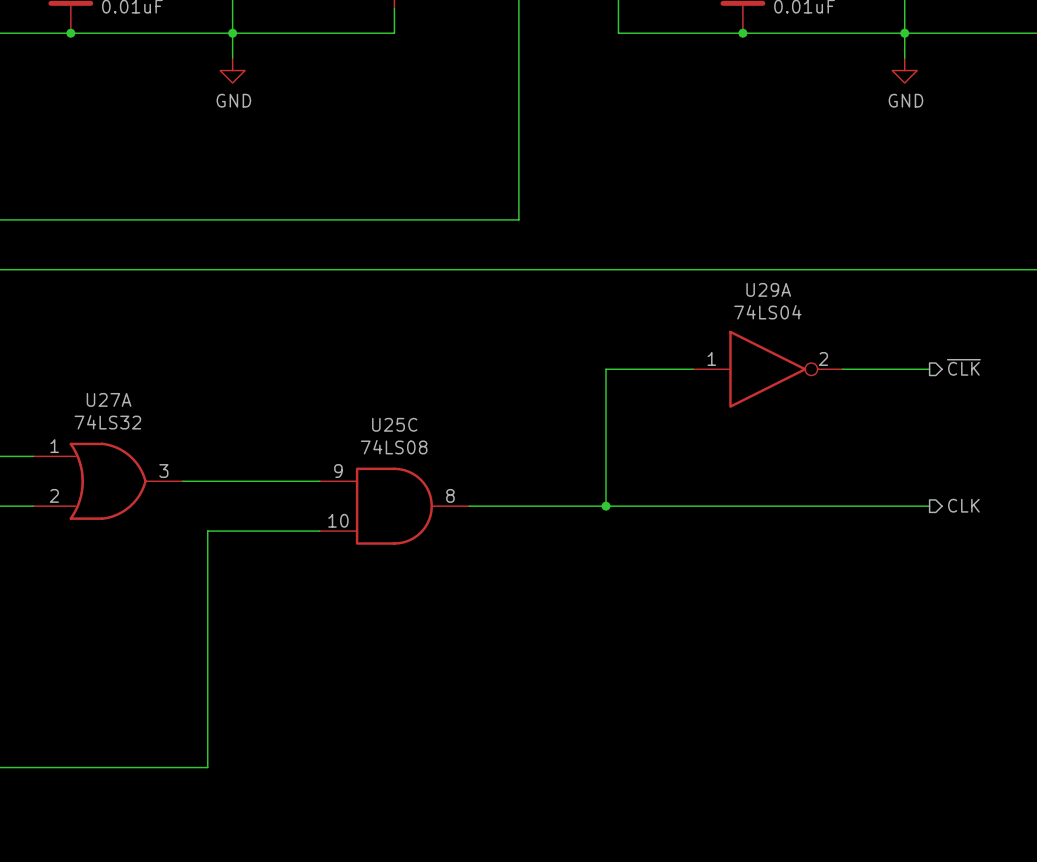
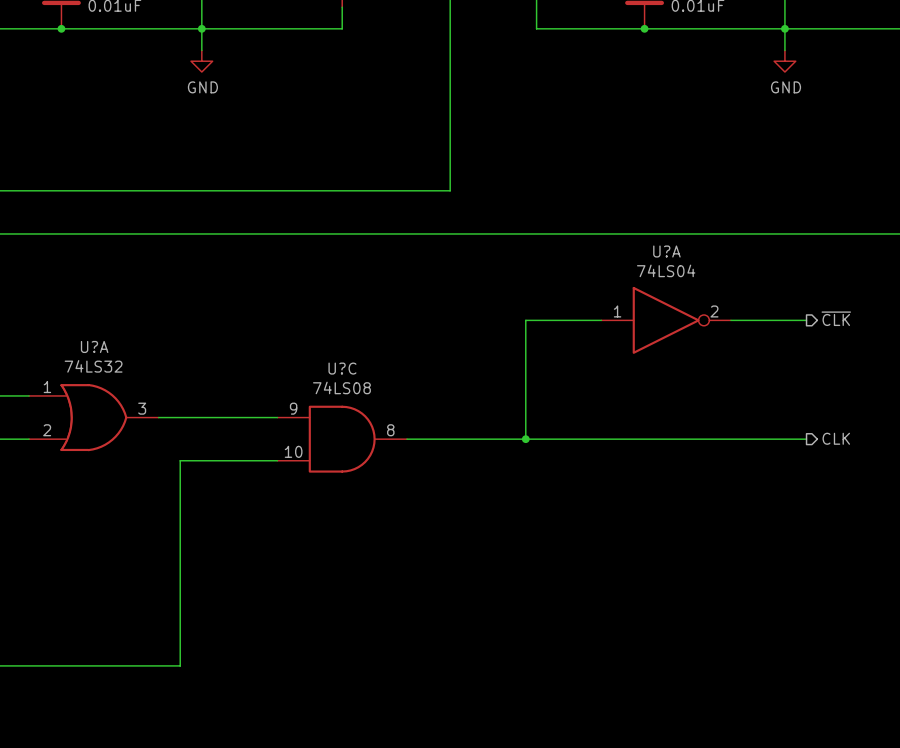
U29A name: U29A (768, 289) -> U?A (666, 251)
U27A name: U27A (109, 399) -> U?A (94, 346)
U25C name: U25C (394, 424) -> U?C (342, 368)

